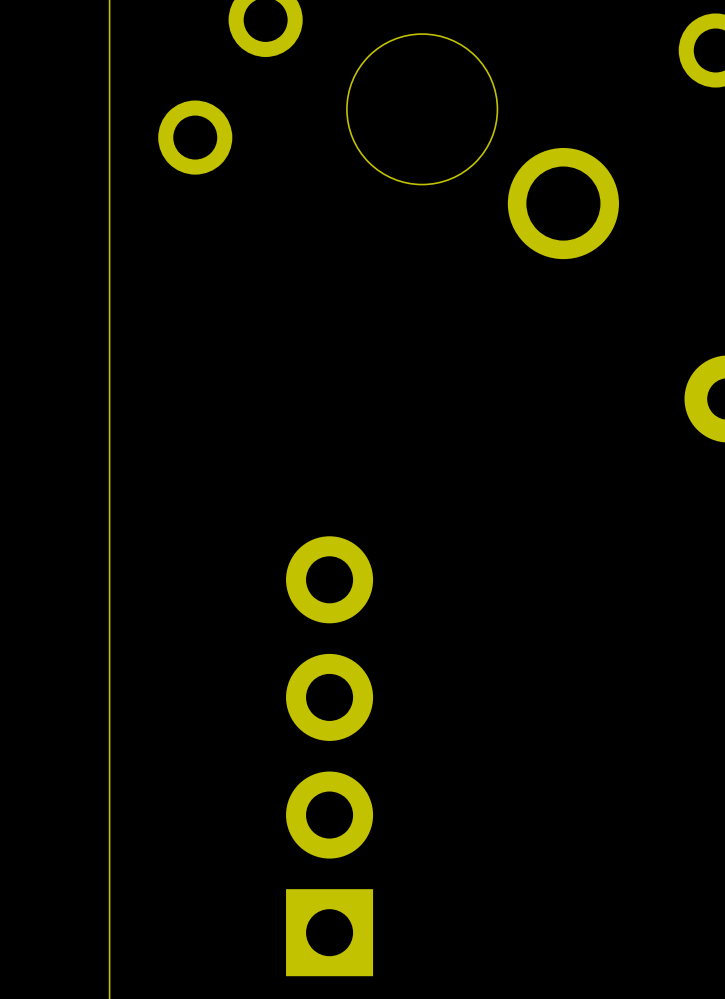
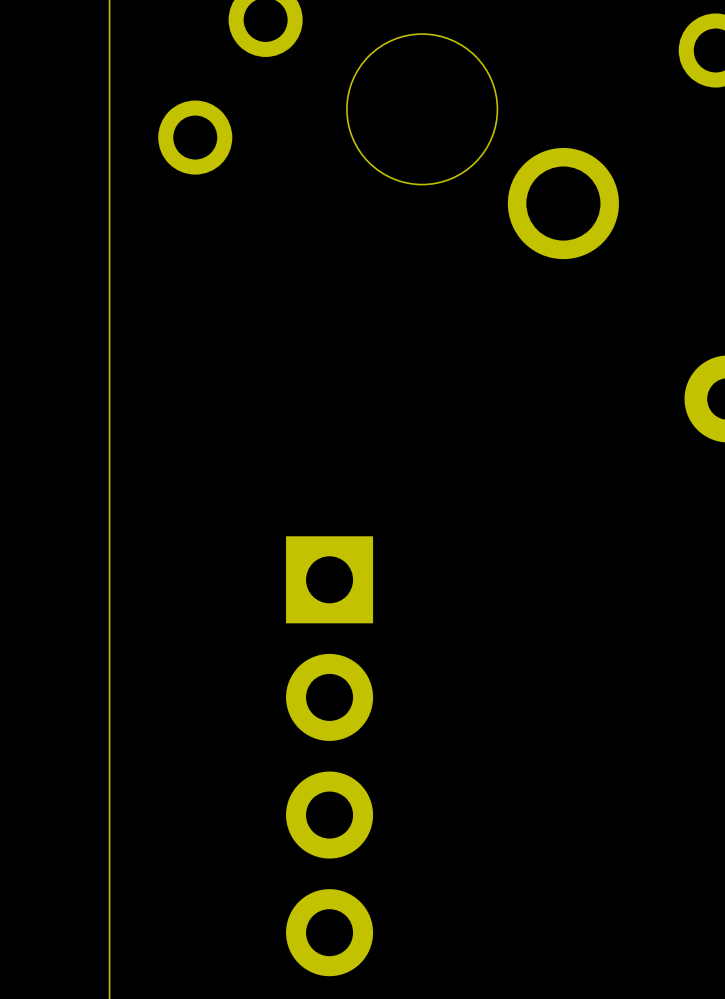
part rotation: 0° (329, 756) -> 180° (329, 756)

